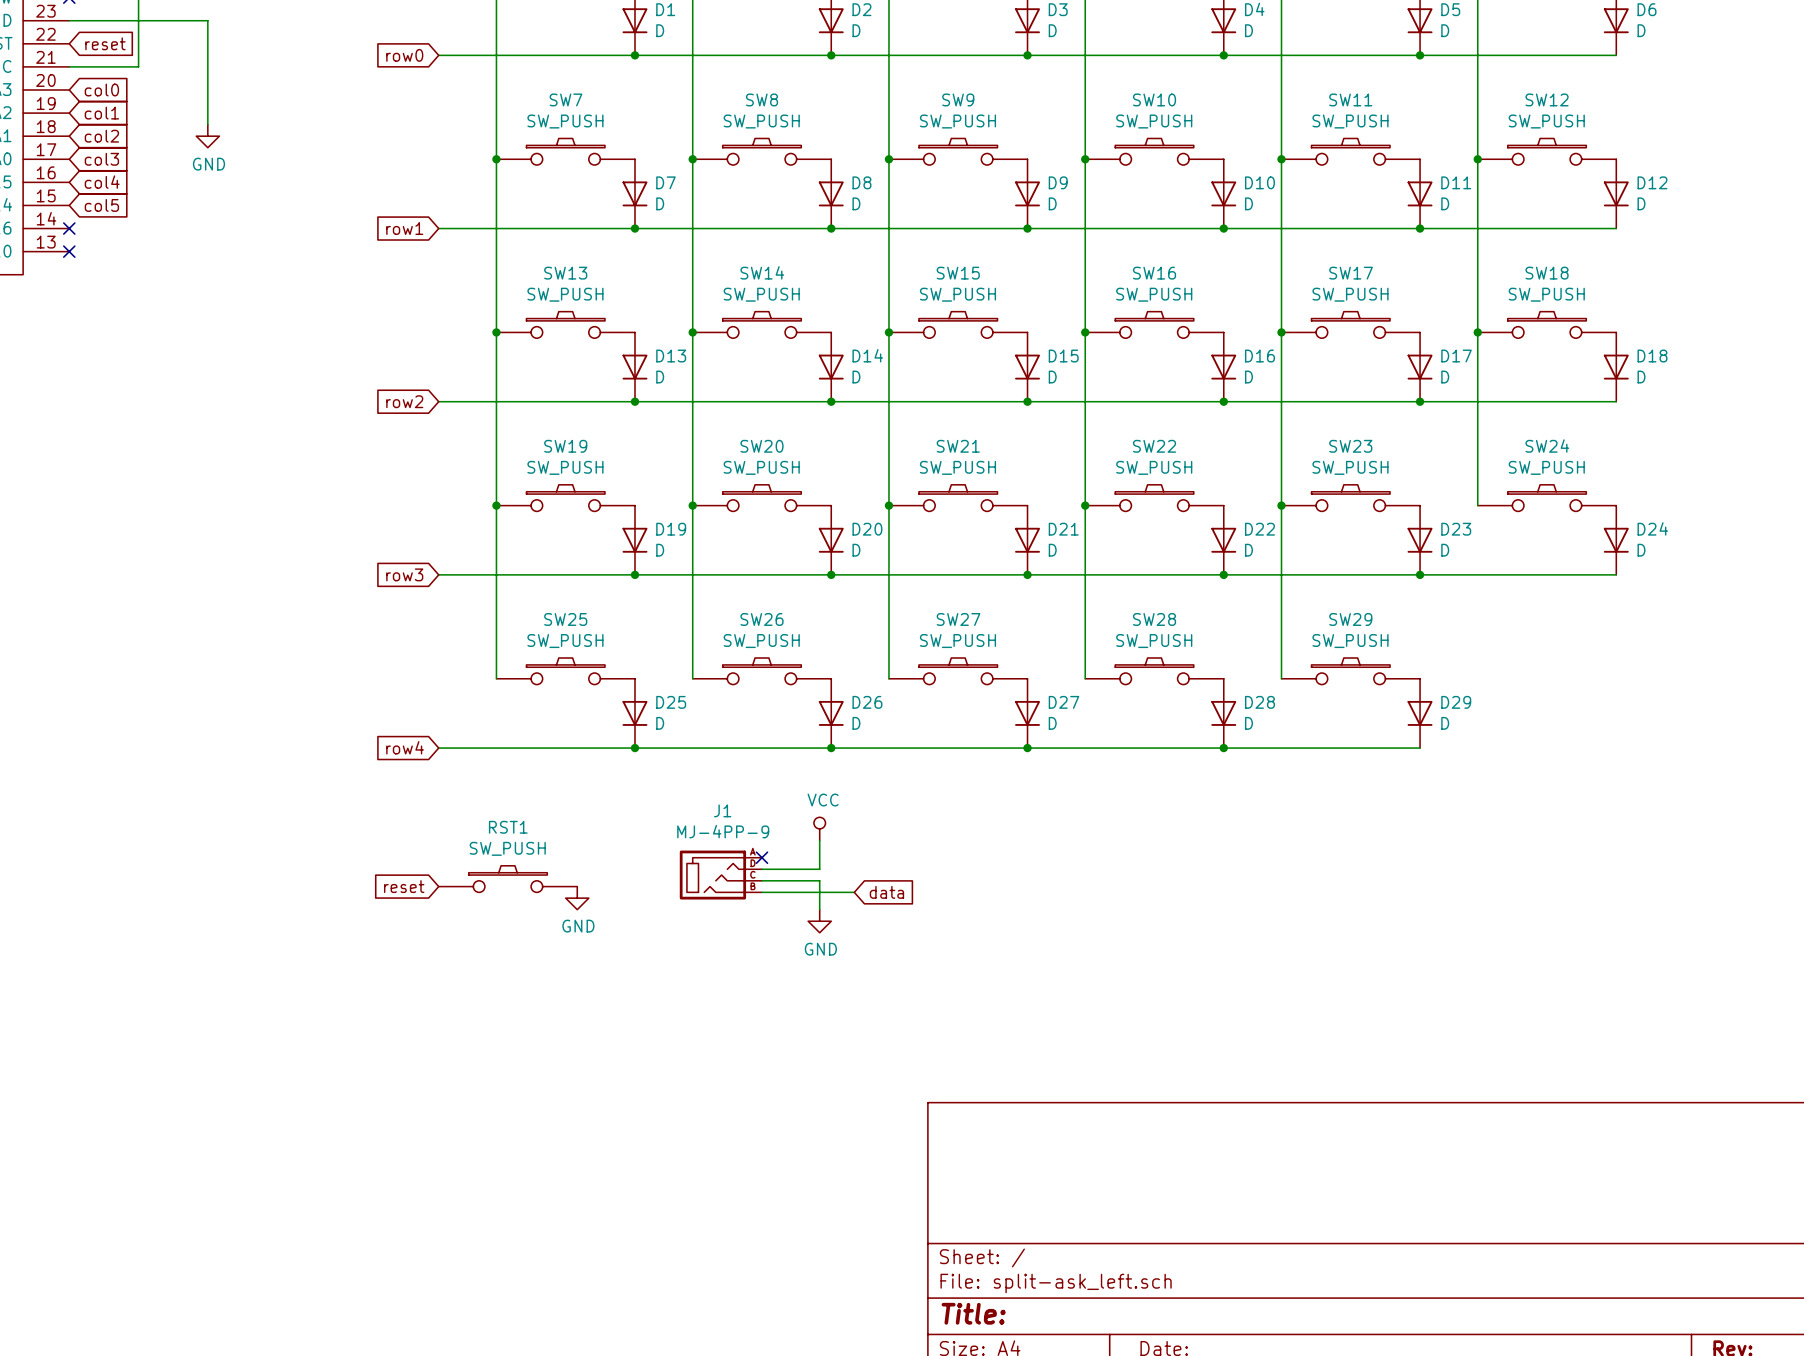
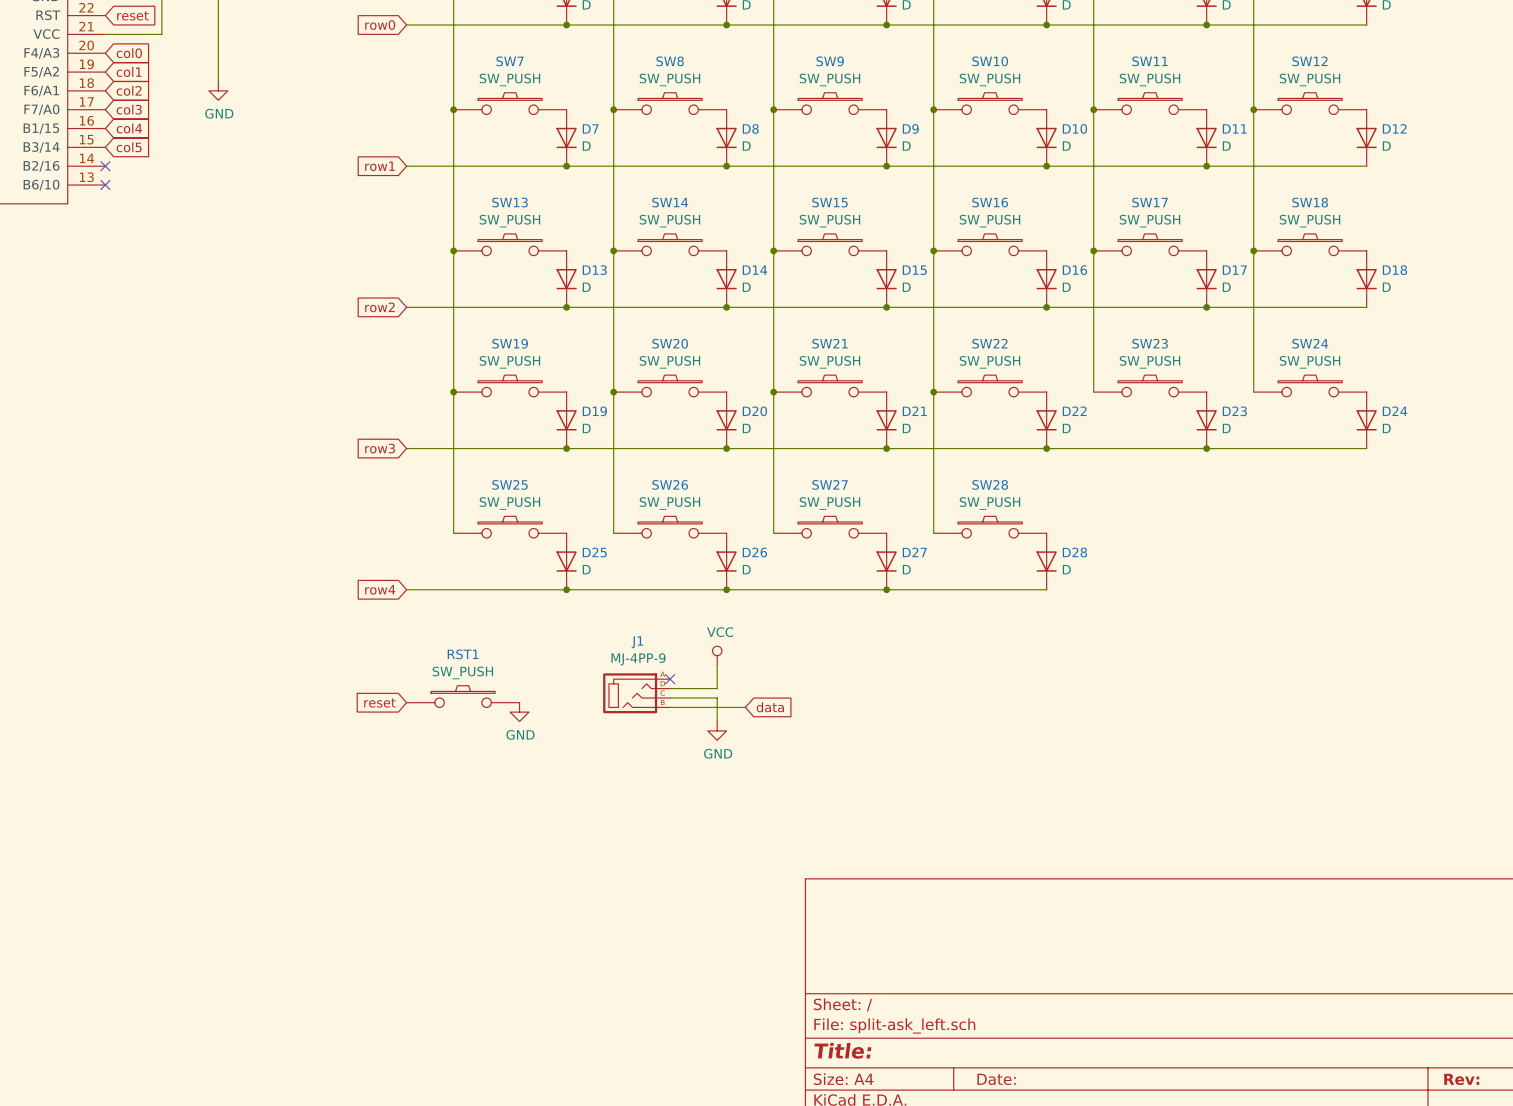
wire: (1281, 505) (1281, 678) -> none
junction: (1281, 505) -> none
SW29: SW_PUSH (1350, 671) -> none
D29: D (1420, 713) -> none
wire: (1223, 748) (1420, 748) -> none
junction: (1223, 748) -> none

